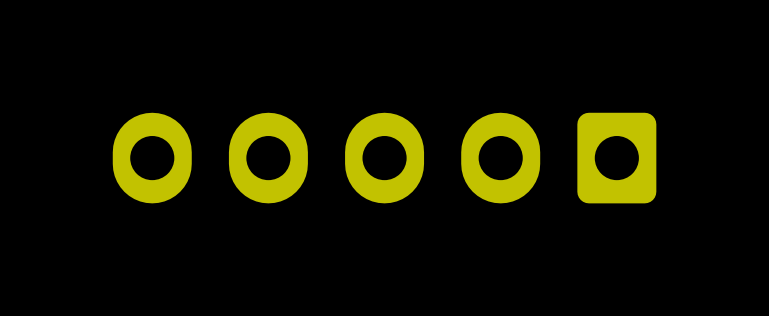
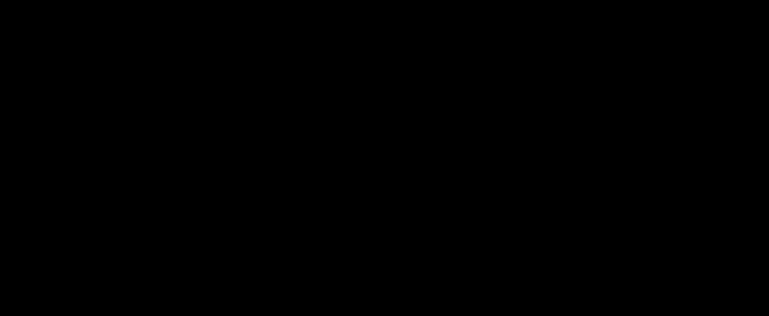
part: (384, 158) -> none

